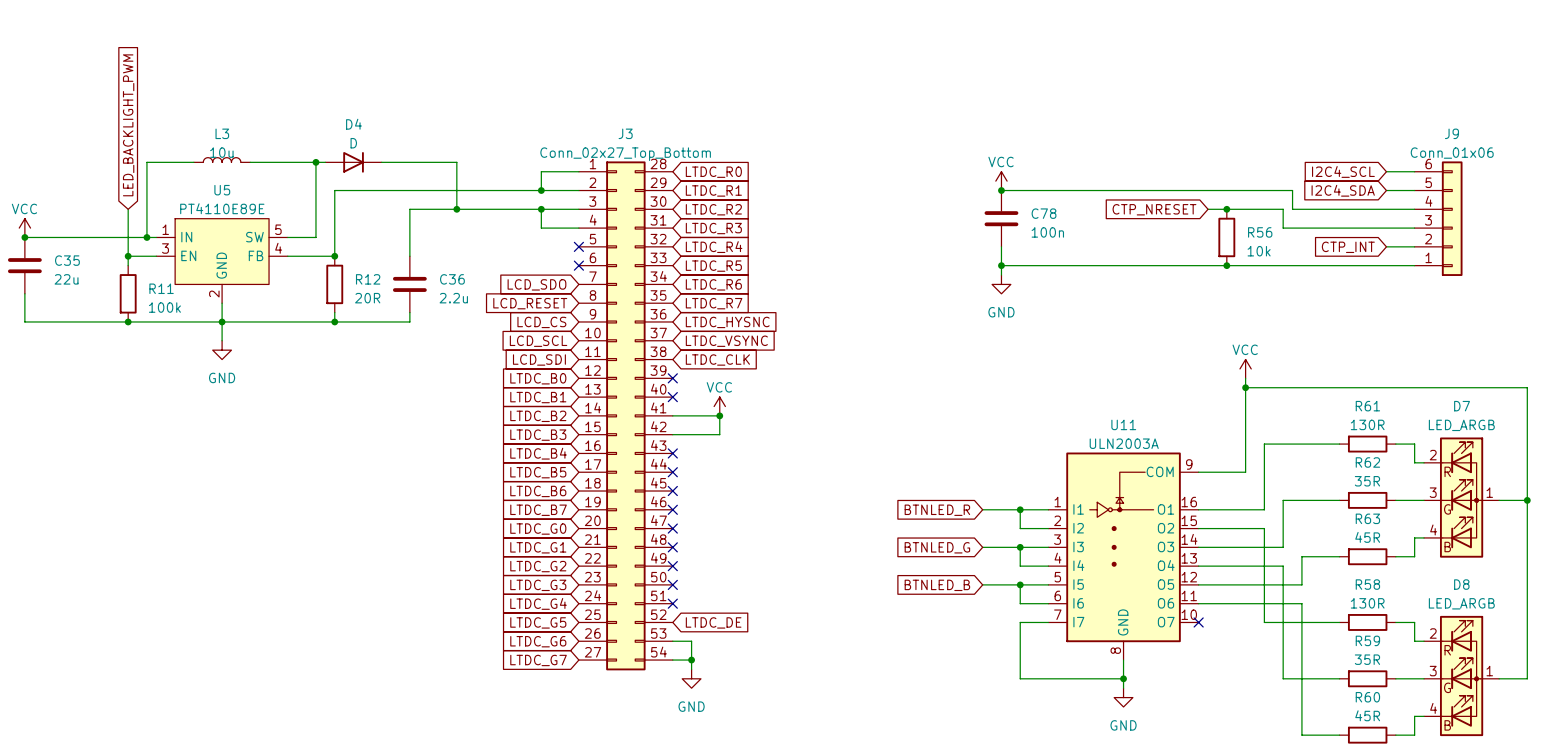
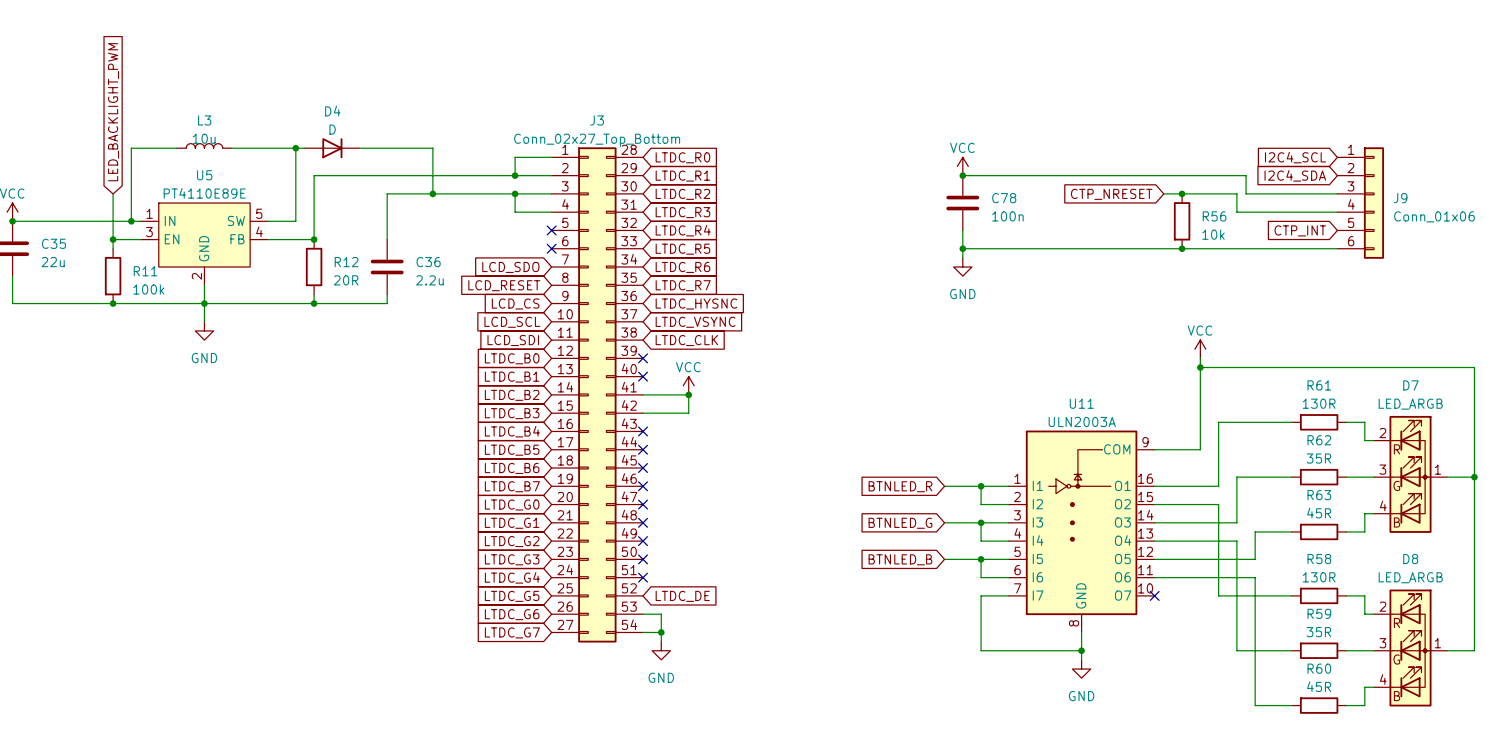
J9 name position: J9 (1451, 133) -> J9 (1400, 198)
J9 value position: Conn_01x06 (1452, 153) -> Conn_01x06 (1434, 216)
J9 flip: as is (1452, 218) -> up-down (1373, 203)

